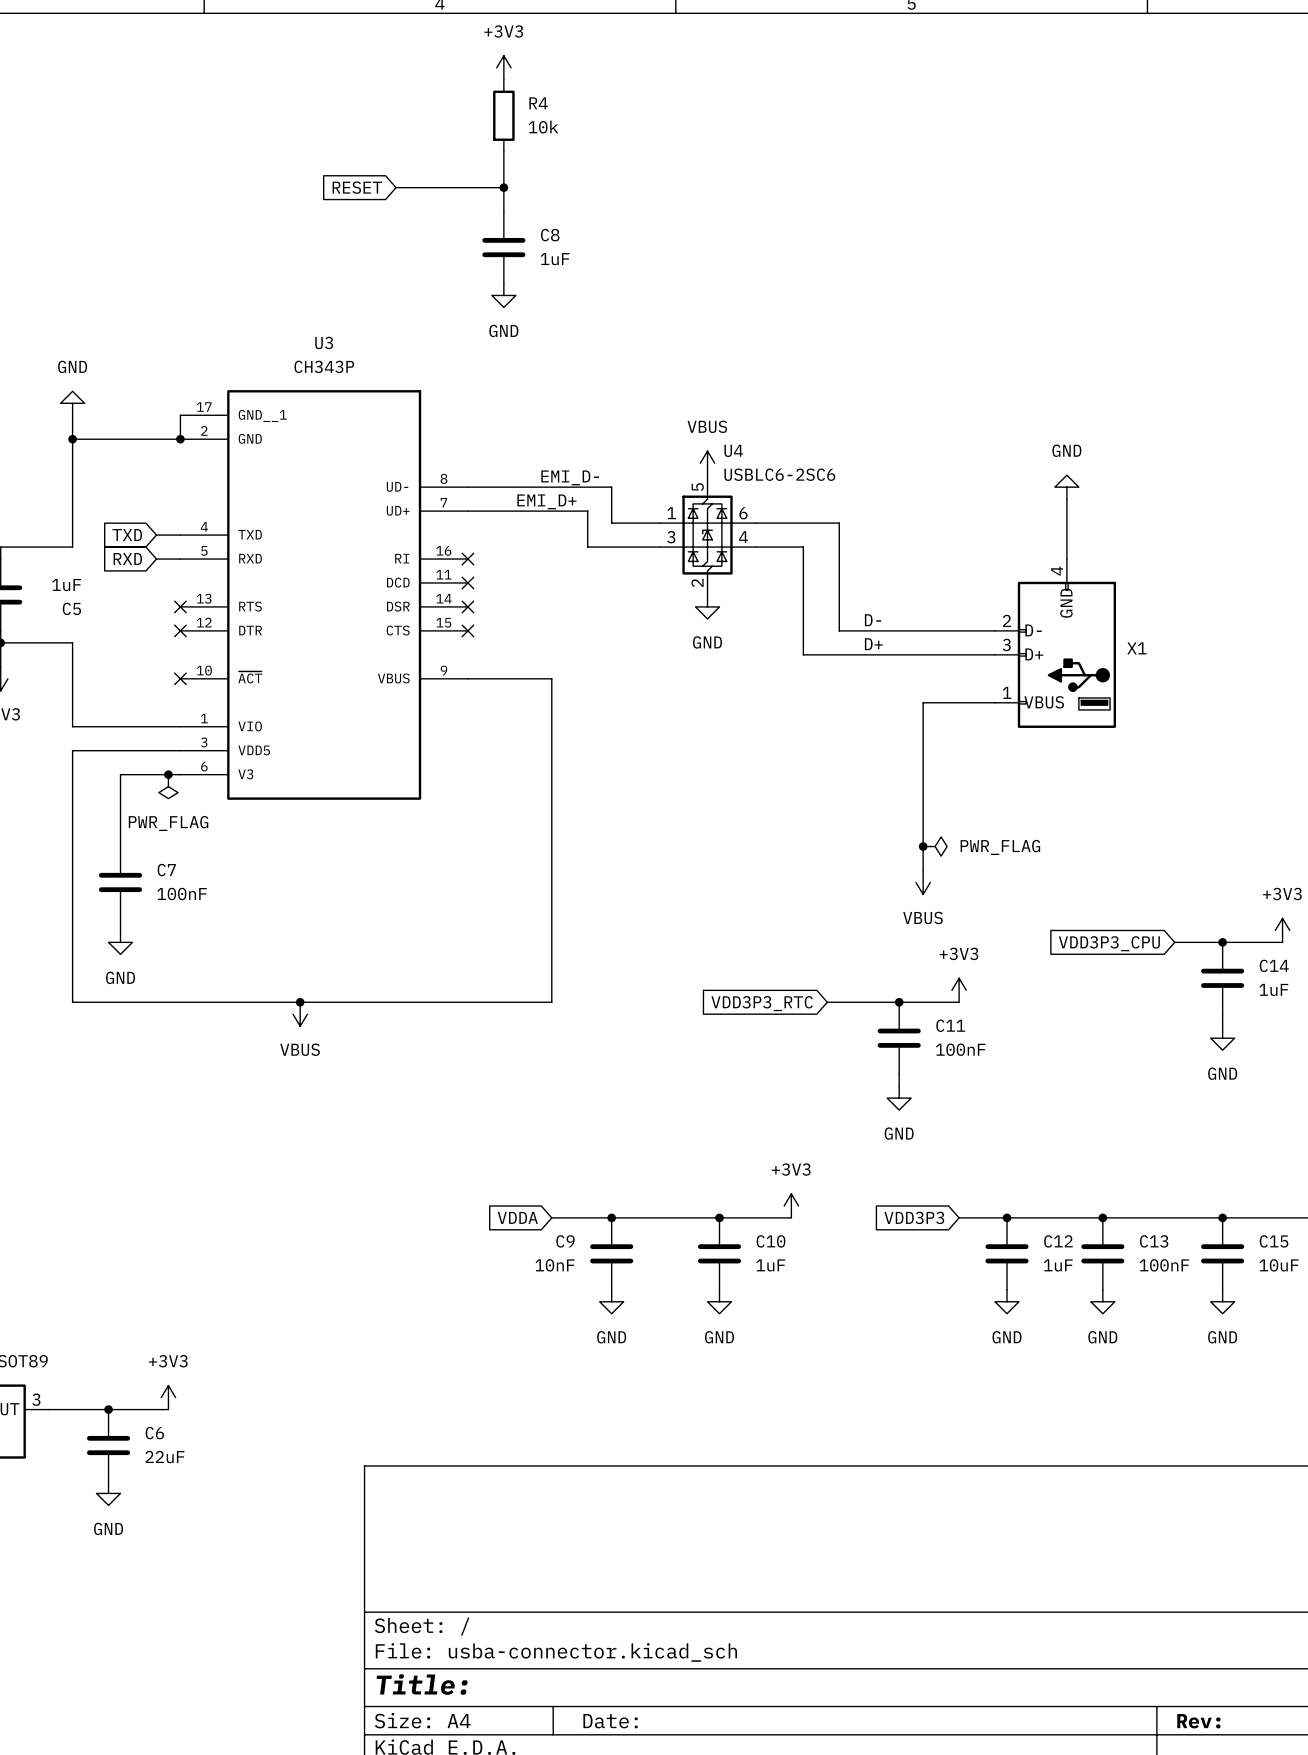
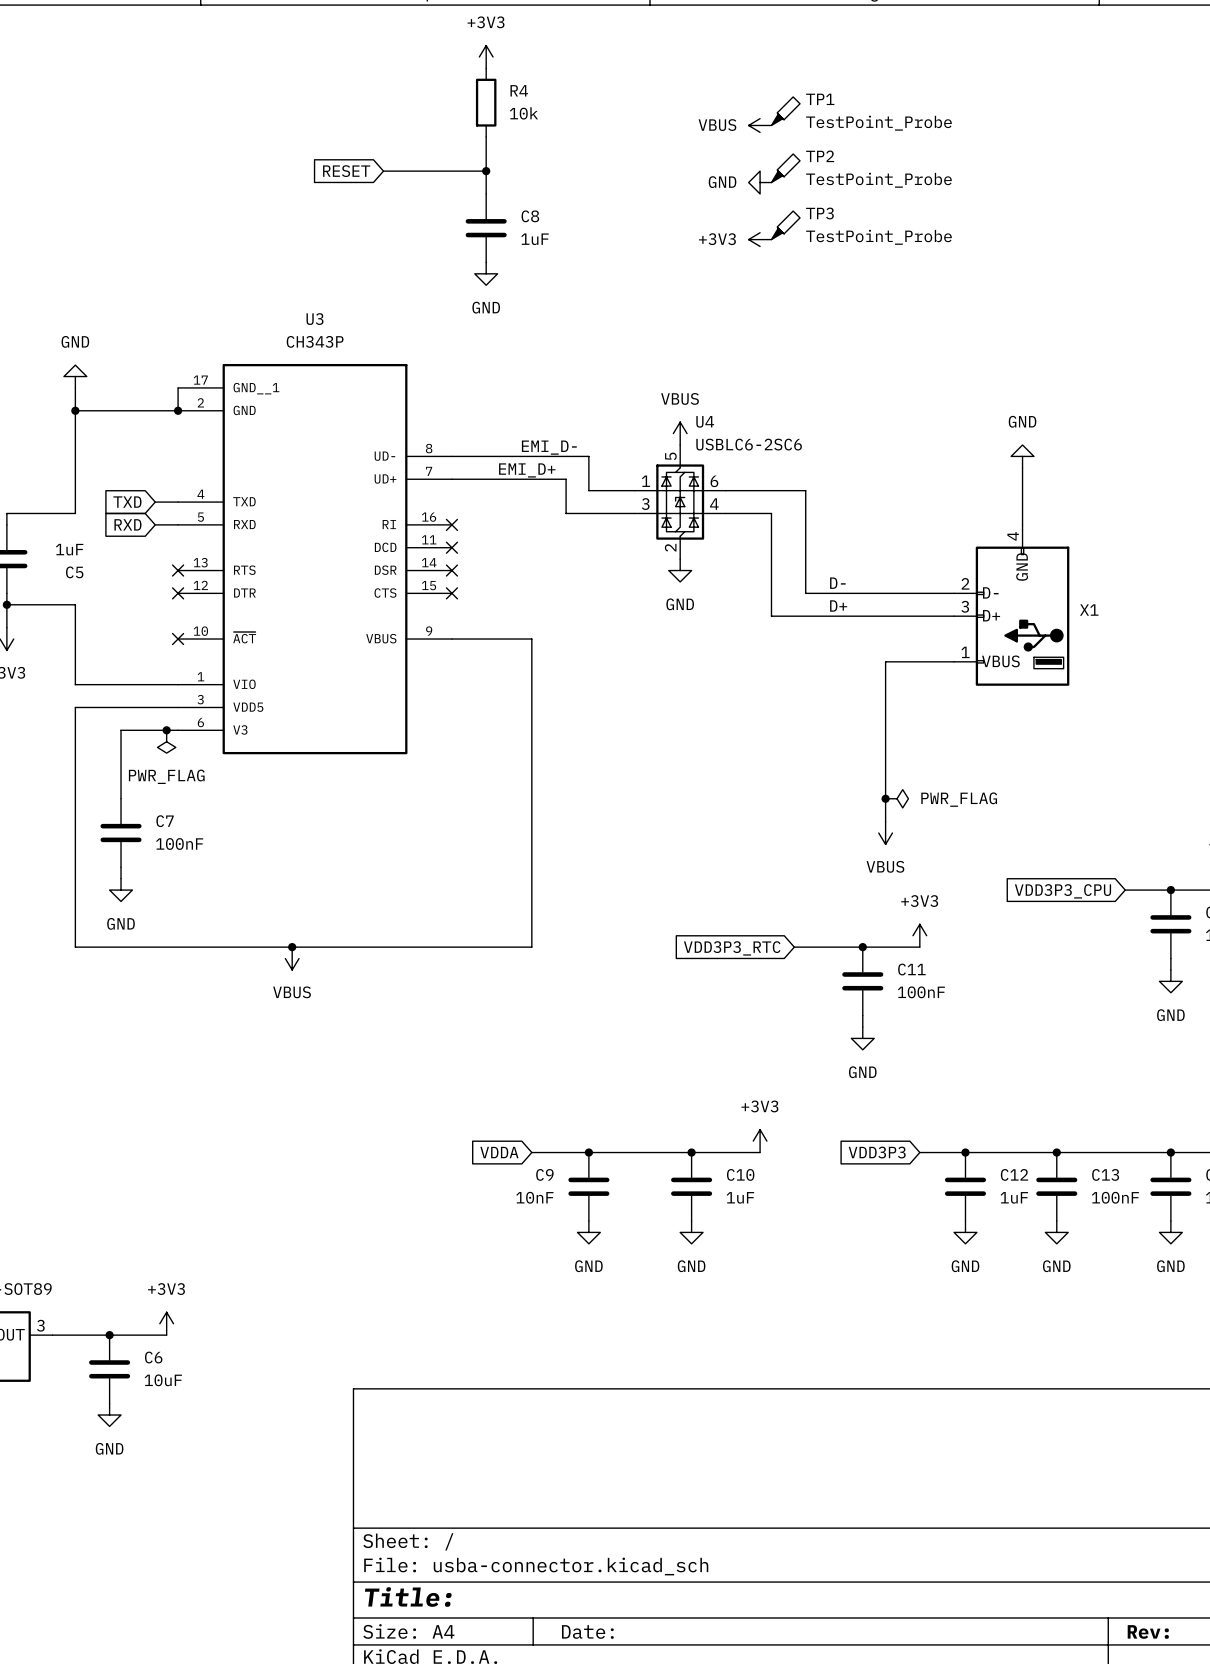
TP1: none -> TestPoint_Probe (785, 111)
power symbol: none -> VBUS (760, 125)
TP2: none -> TestPoint_Probe (785, 168)
power symbol: none -> GND (760, 182)
TP3: none -> TestPoint_Probe (785, 225)
power symbol: none -> +3V3 (760, 239)
C6 value: 22uF (165, 1457) -> 10uF (163, 1380)

